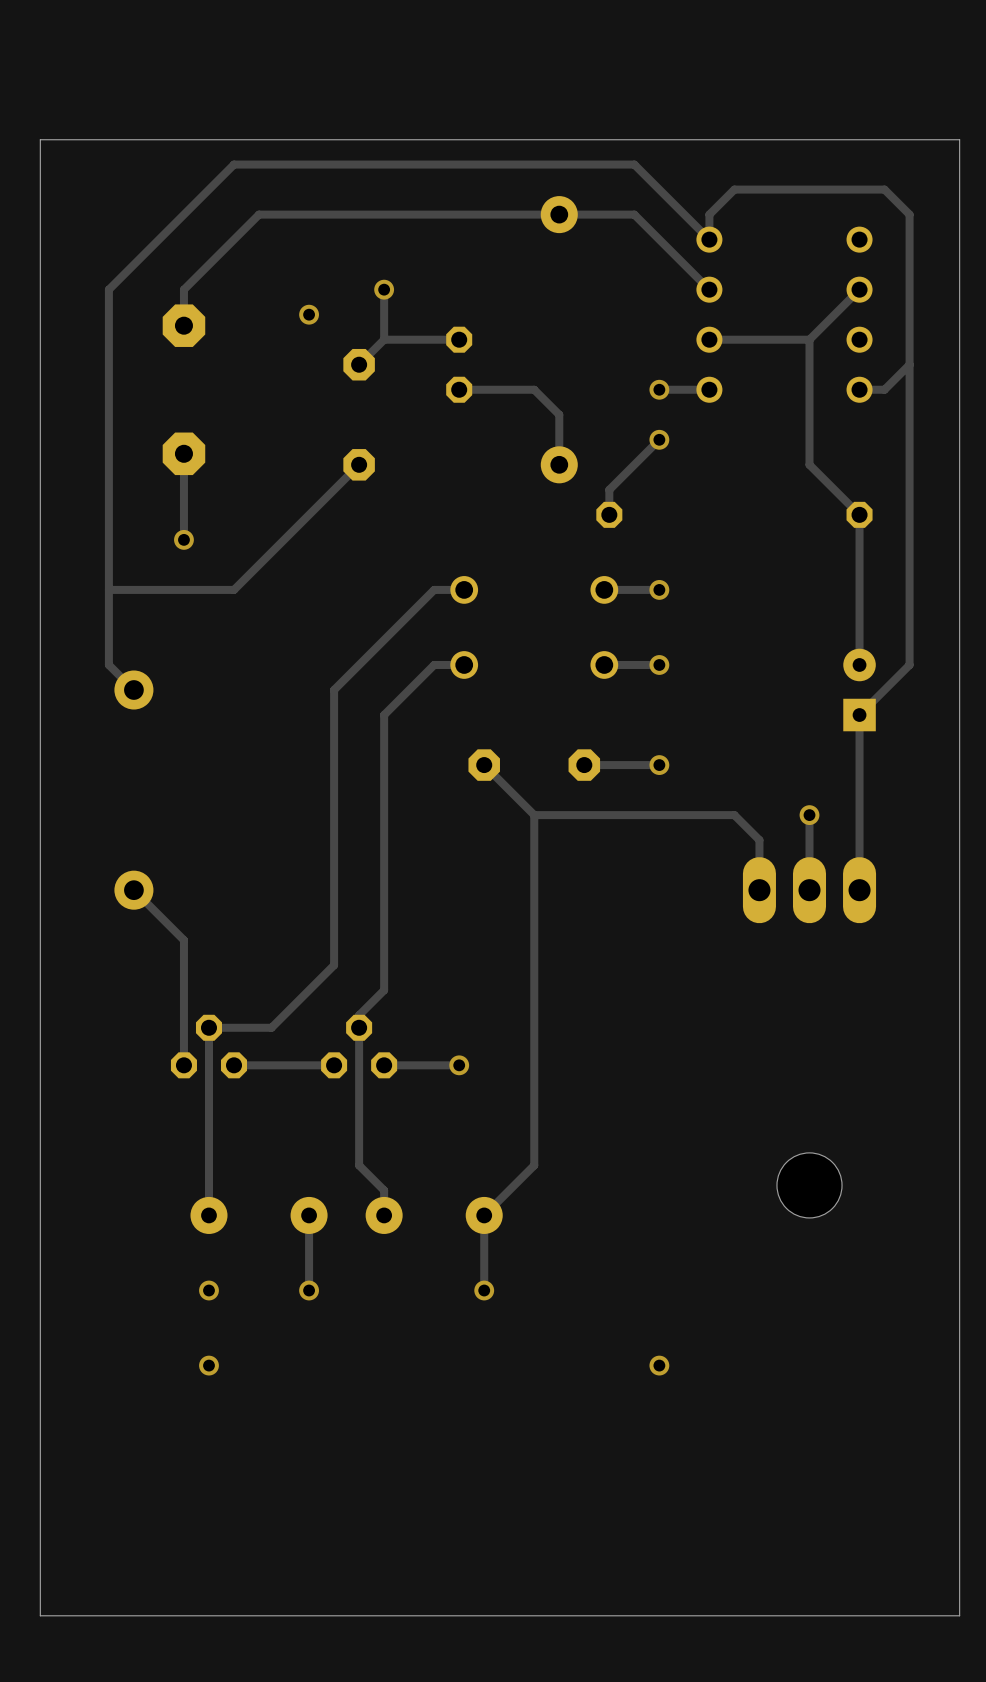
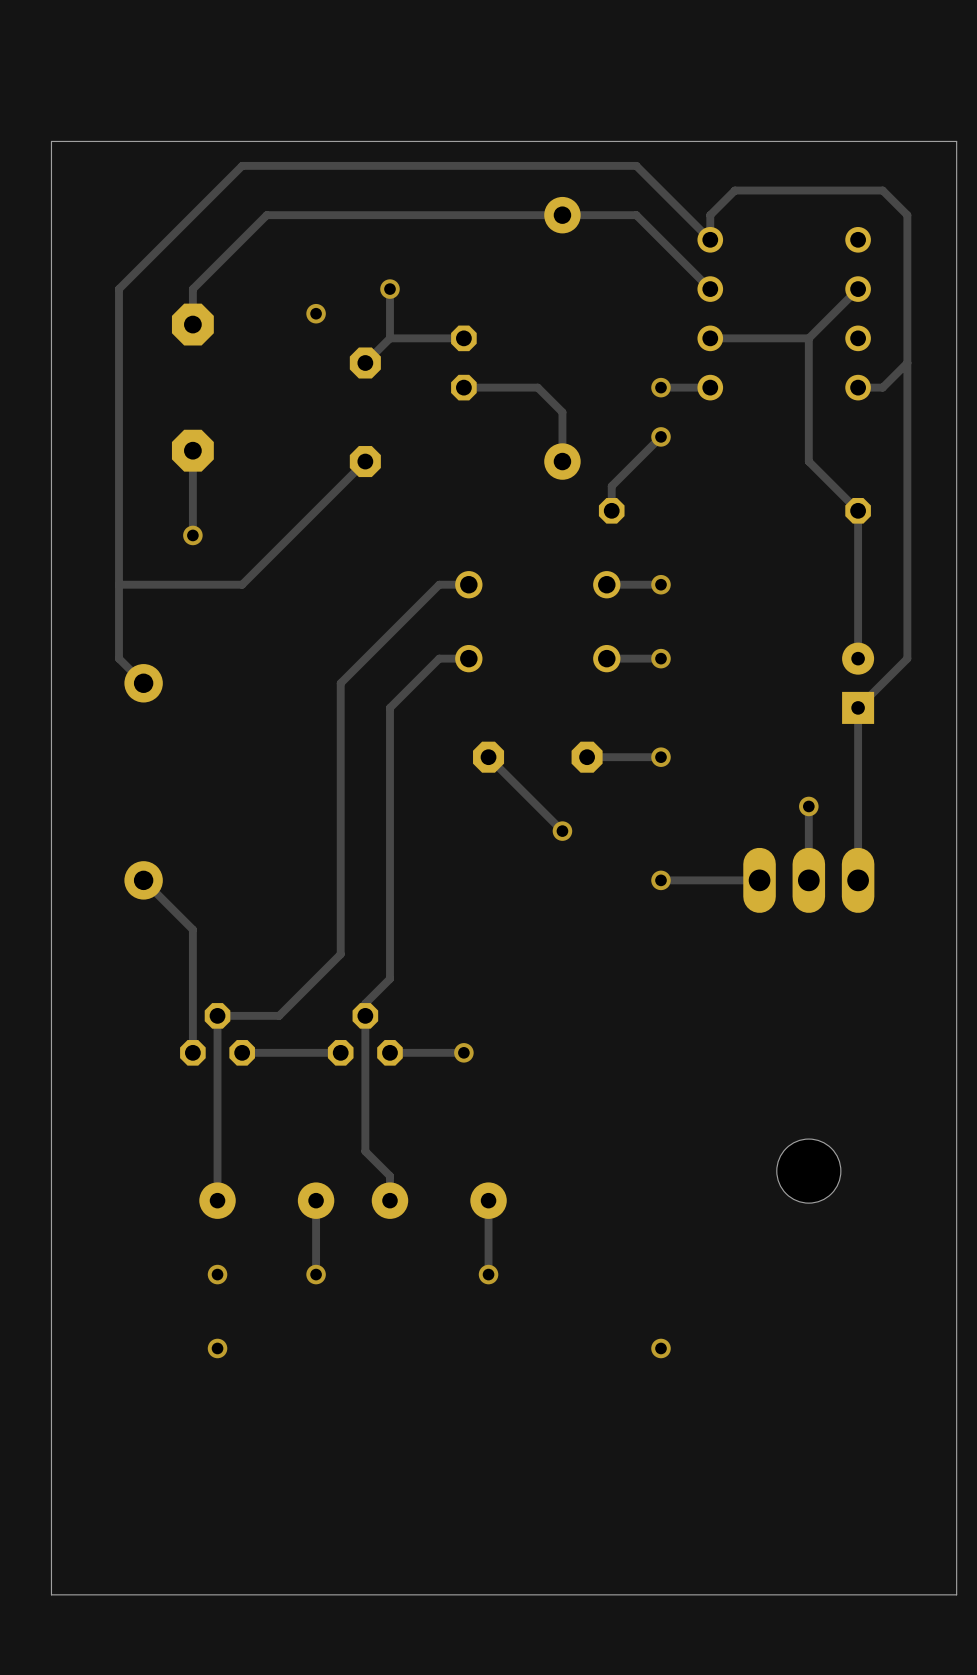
track: none -> (537, 806) (562, 831)
via: none -> (562, 831)
via: none -> (661, 880)
track: (759, 890) (759, 840) (734, 815) (534, 815) (534, 1165) (484, 1215) -> (759, 880) (661, 880)

